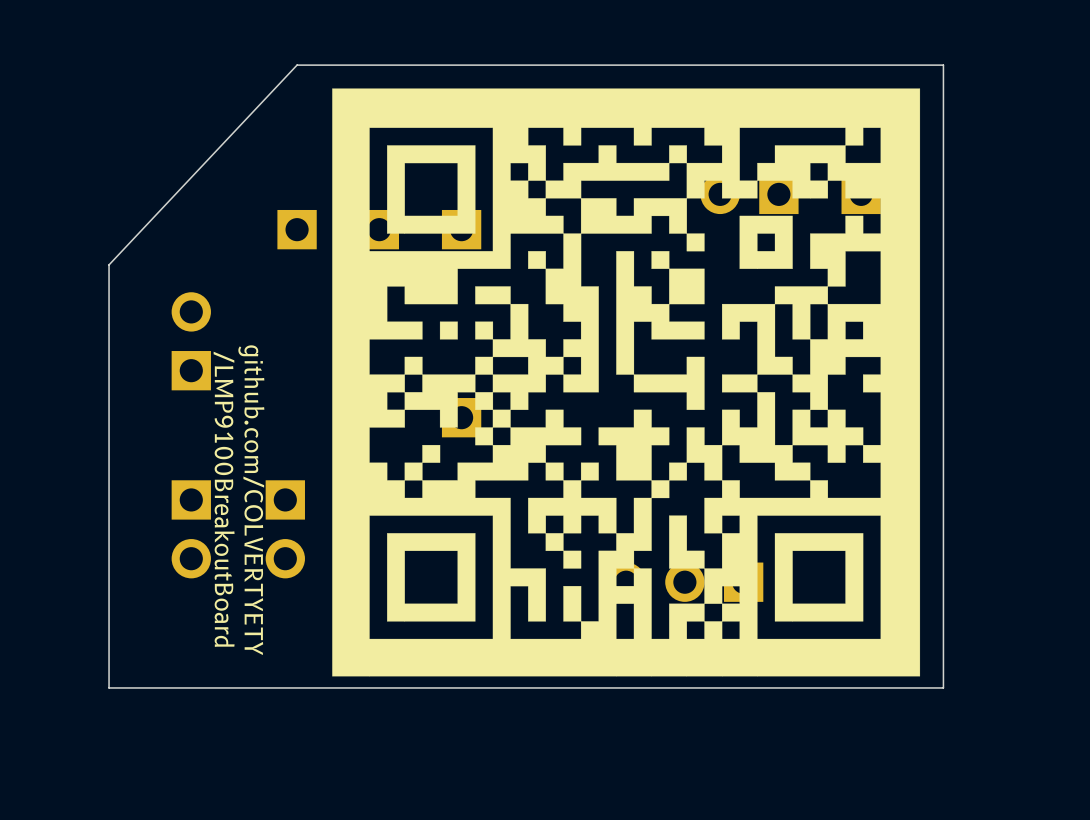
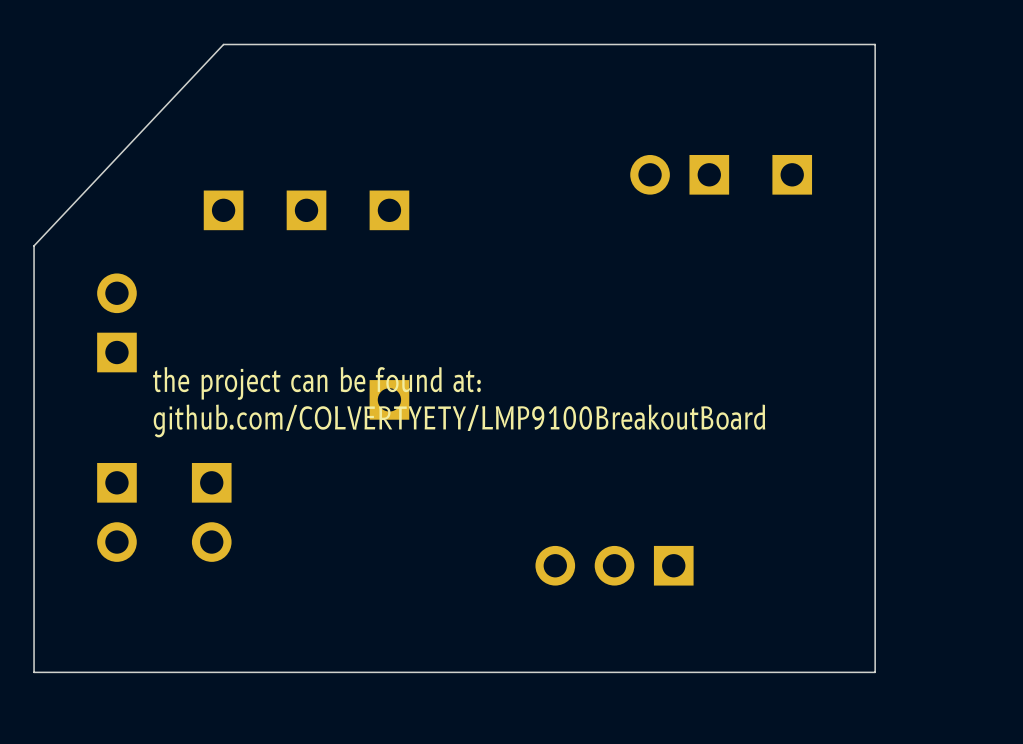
drawing: [332, 88, 921, 677] -> none
text: none -> the project can be found at: (316, 383)
text: none -> github.com/COLVERTYETY/LMP9100BreakoutBoard (459, 420)
text: /LMP9100BreakoutBoard (224, 499) -> none
text: github.com/COLVERTYETY (251, 500) -> none

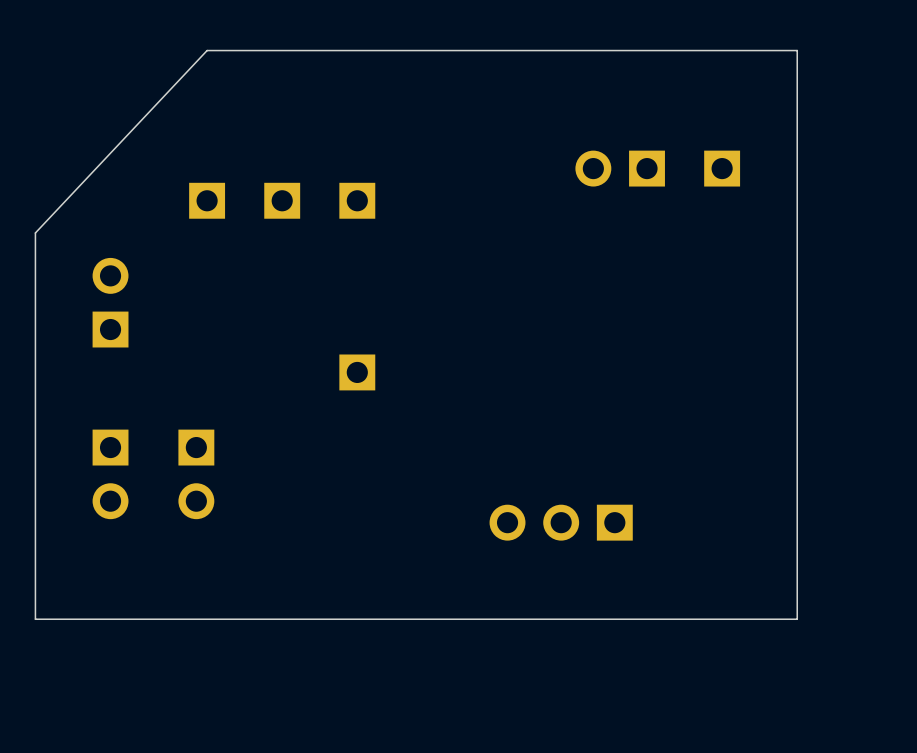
text: the project can be found at: (316, 383) -> none
text: github.com/COLVERTYETY/LMP9100BreakoutBoard (459, 420) -> none

